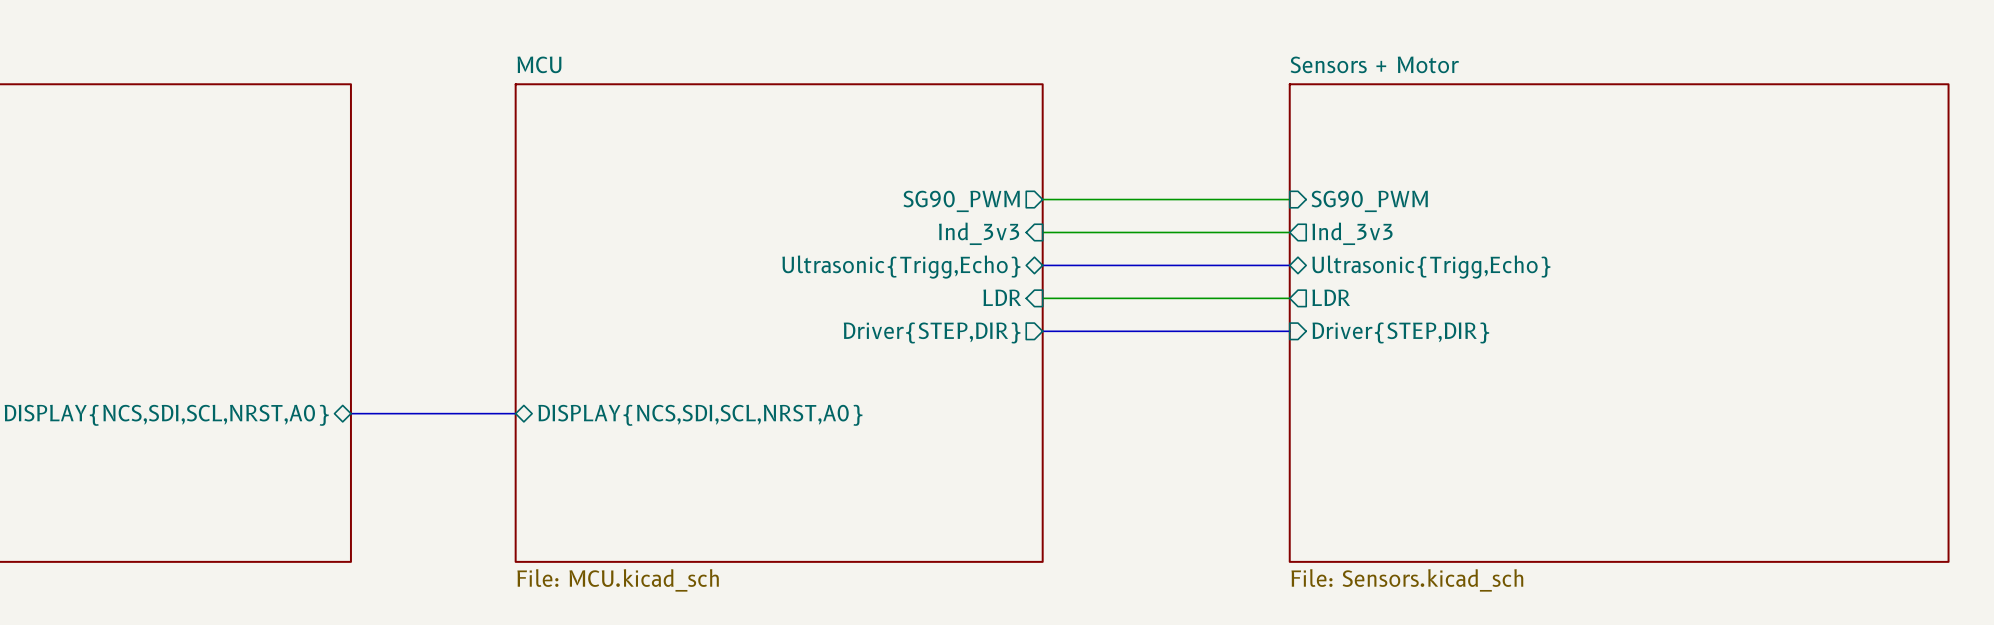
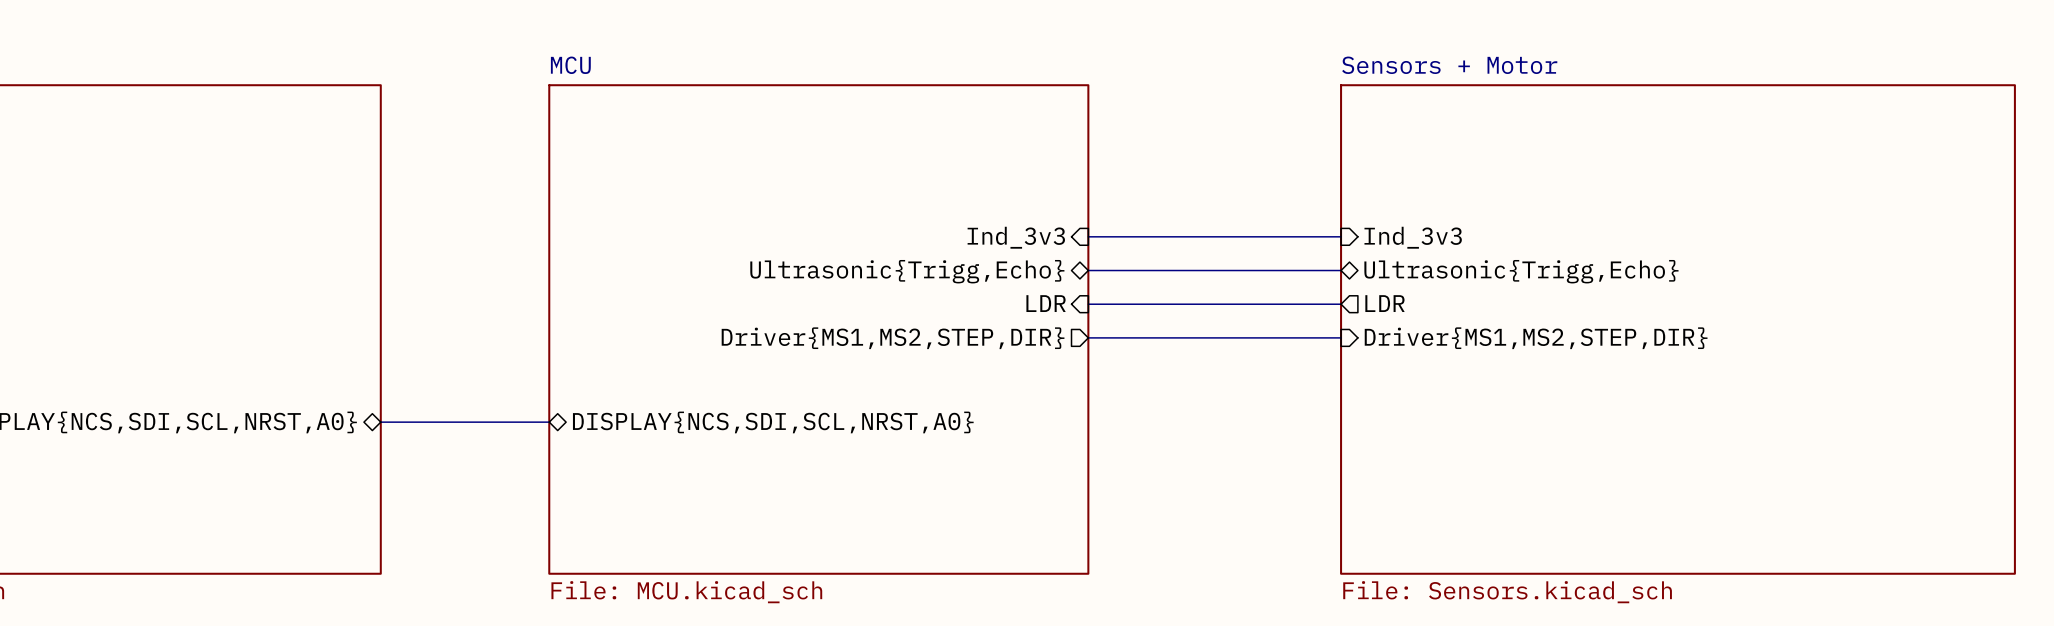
wire: (1042, 199) (1289, 199) -> none
sheet pin: SG90_PWM (961, 201) -> none
sheet pin: SG90_PWM (1369, 201) -> none
sheet pin shape: output (1352, 233) -> input (1413, 237)
sheet pin: Driver{STEP,DIR} (932, 332) -> Driver{MS1,MS2,STEP,DIR} (893, 338)
sheet pin: Driver{STEP,DIR} (1400, 332) -> Driver{MS1,MS2,STEP,DIR} (1536, 338)

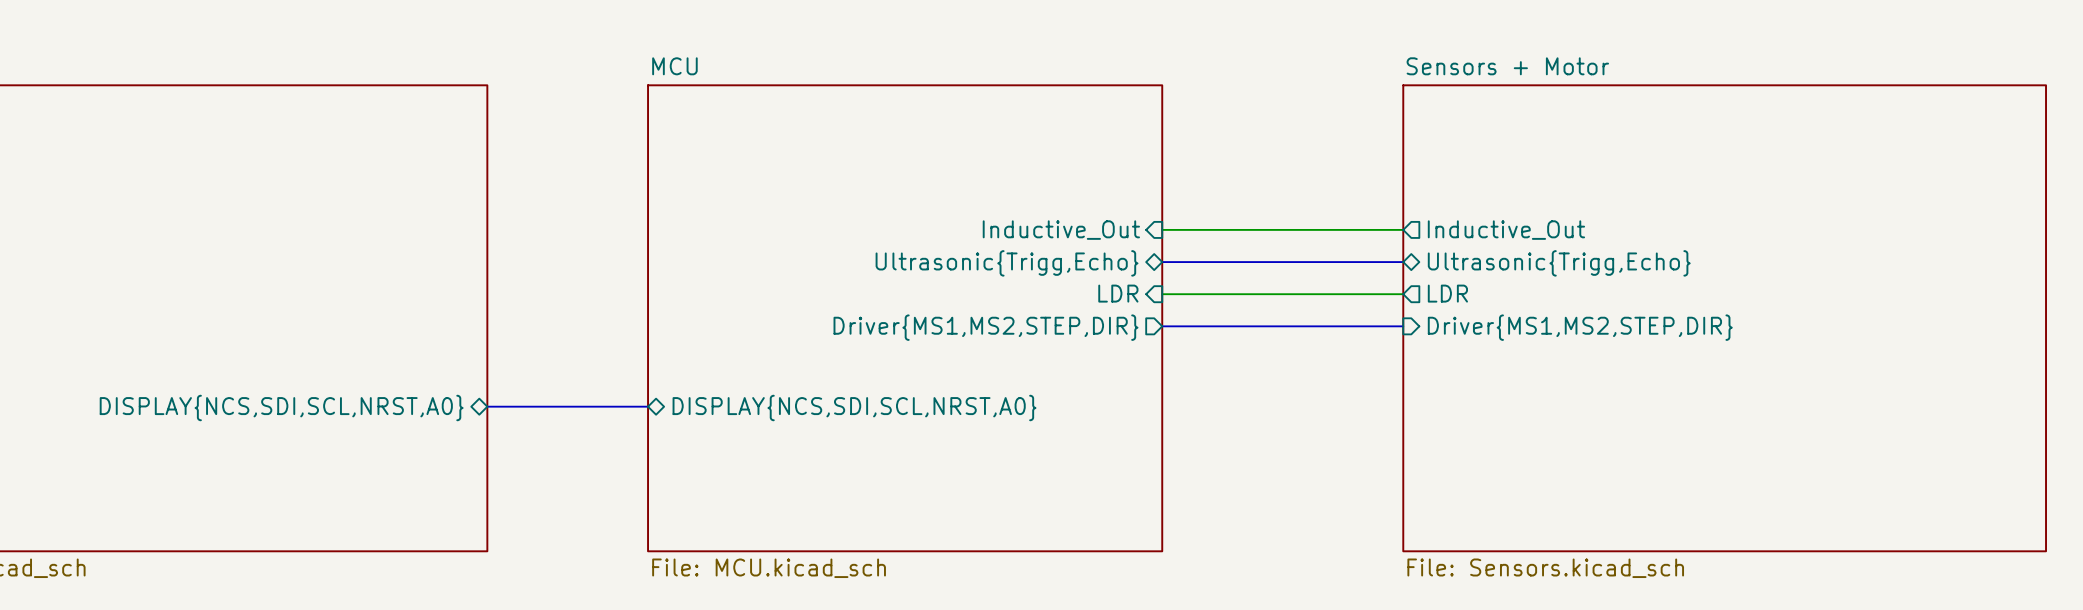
sheet pin: Ind_3v3 (1016, 237) -> Inductive_Out (1061, 230)
sheet pin shape: input (1413, 237) -> output (1506, 230)
sheet pin: Ind_3v3 (1413, 237) -> Inductive_Out (1506, 230)

